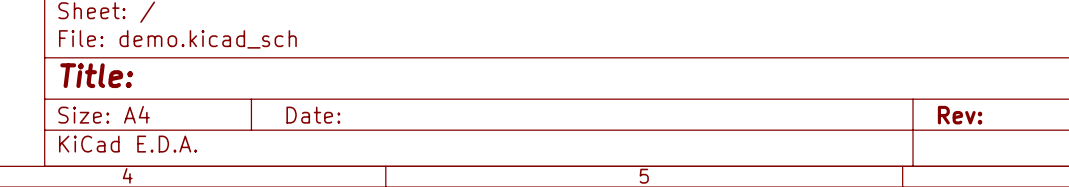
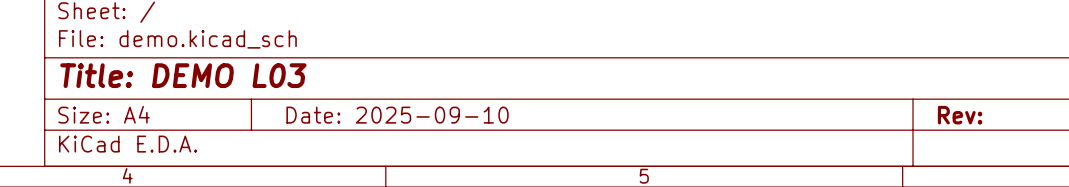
title block: Title: (96, 75) -> Title: DEMO L03 (183, 75)
title block: Date: (313, 115) -> Date: 2025-09-10 (397, 115)

